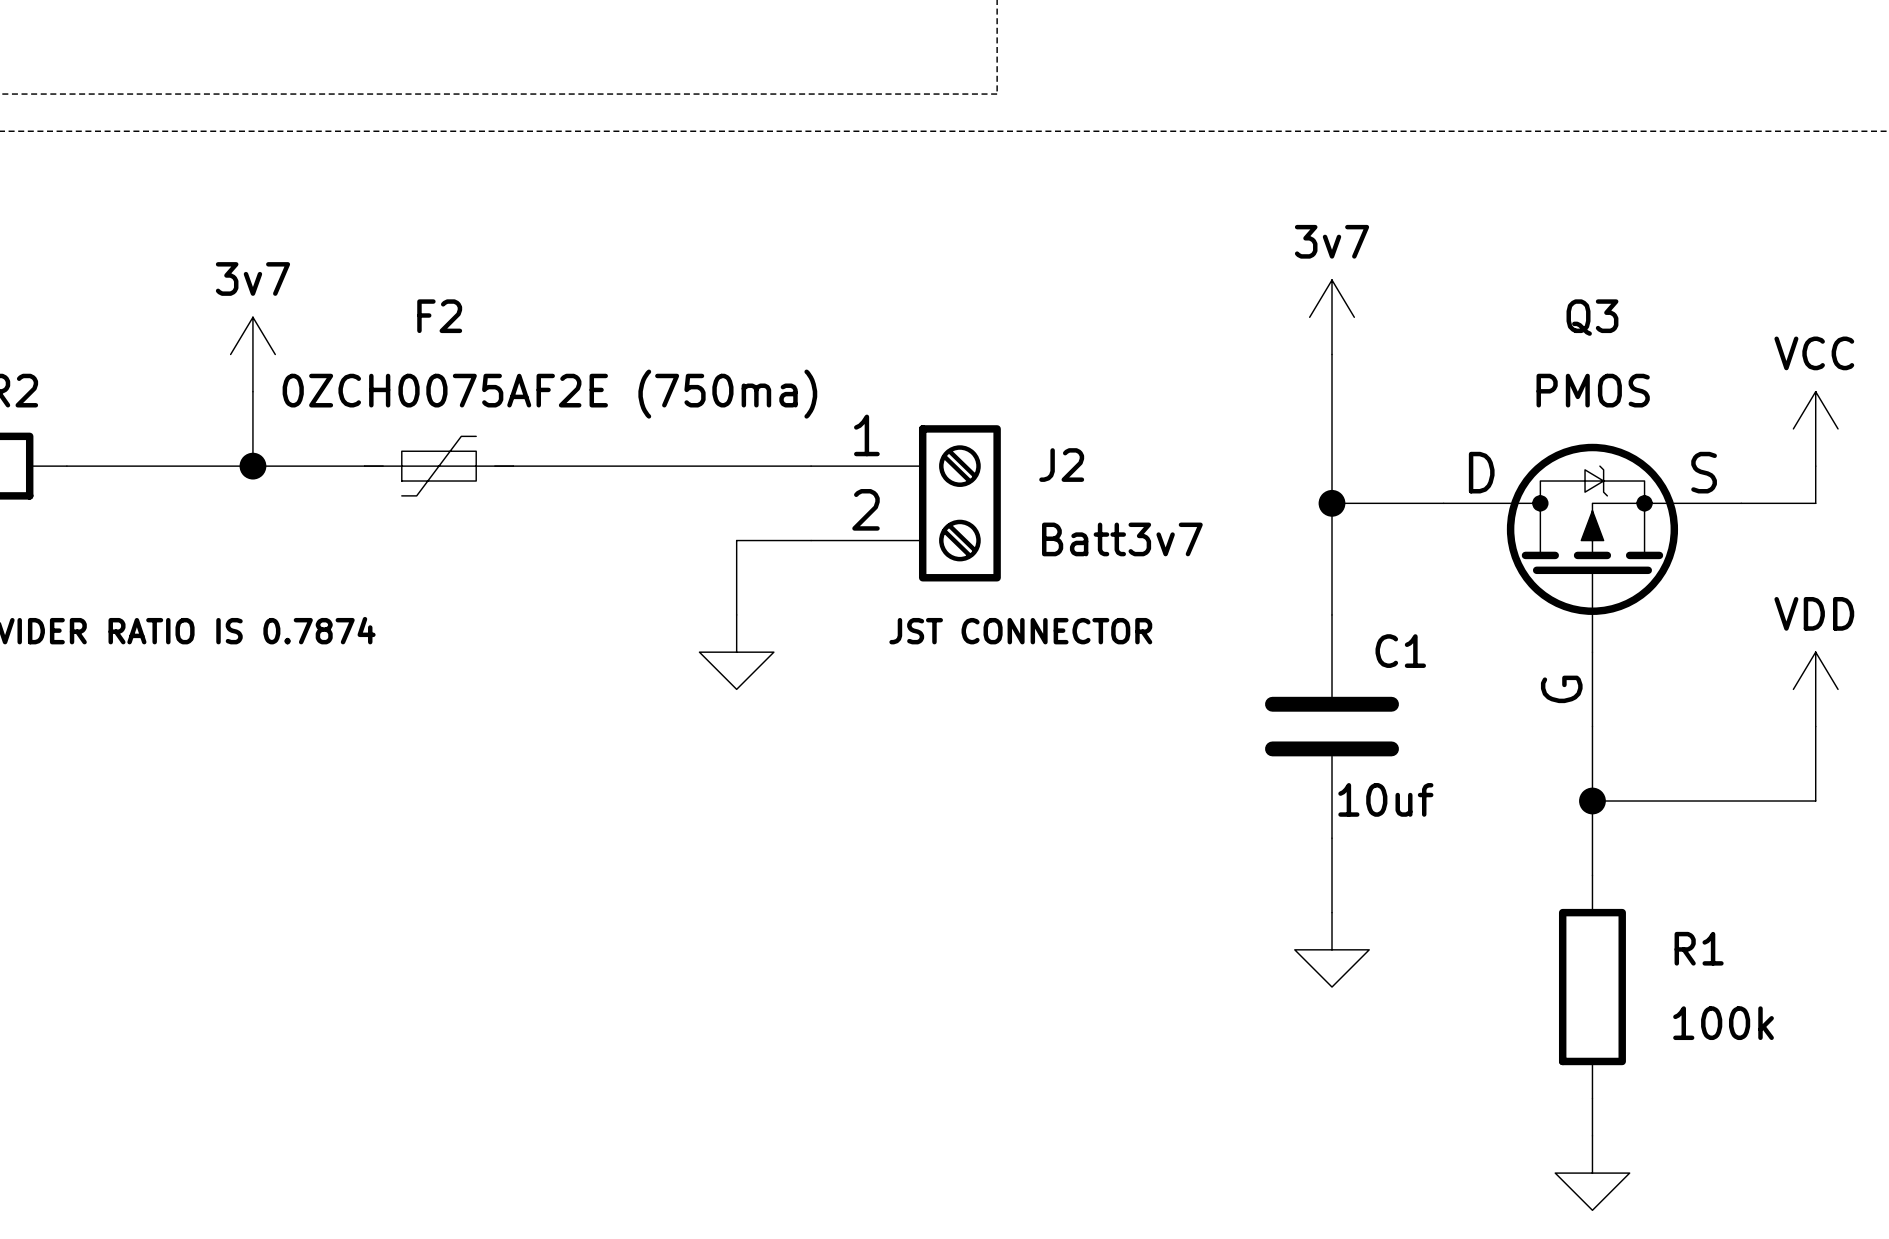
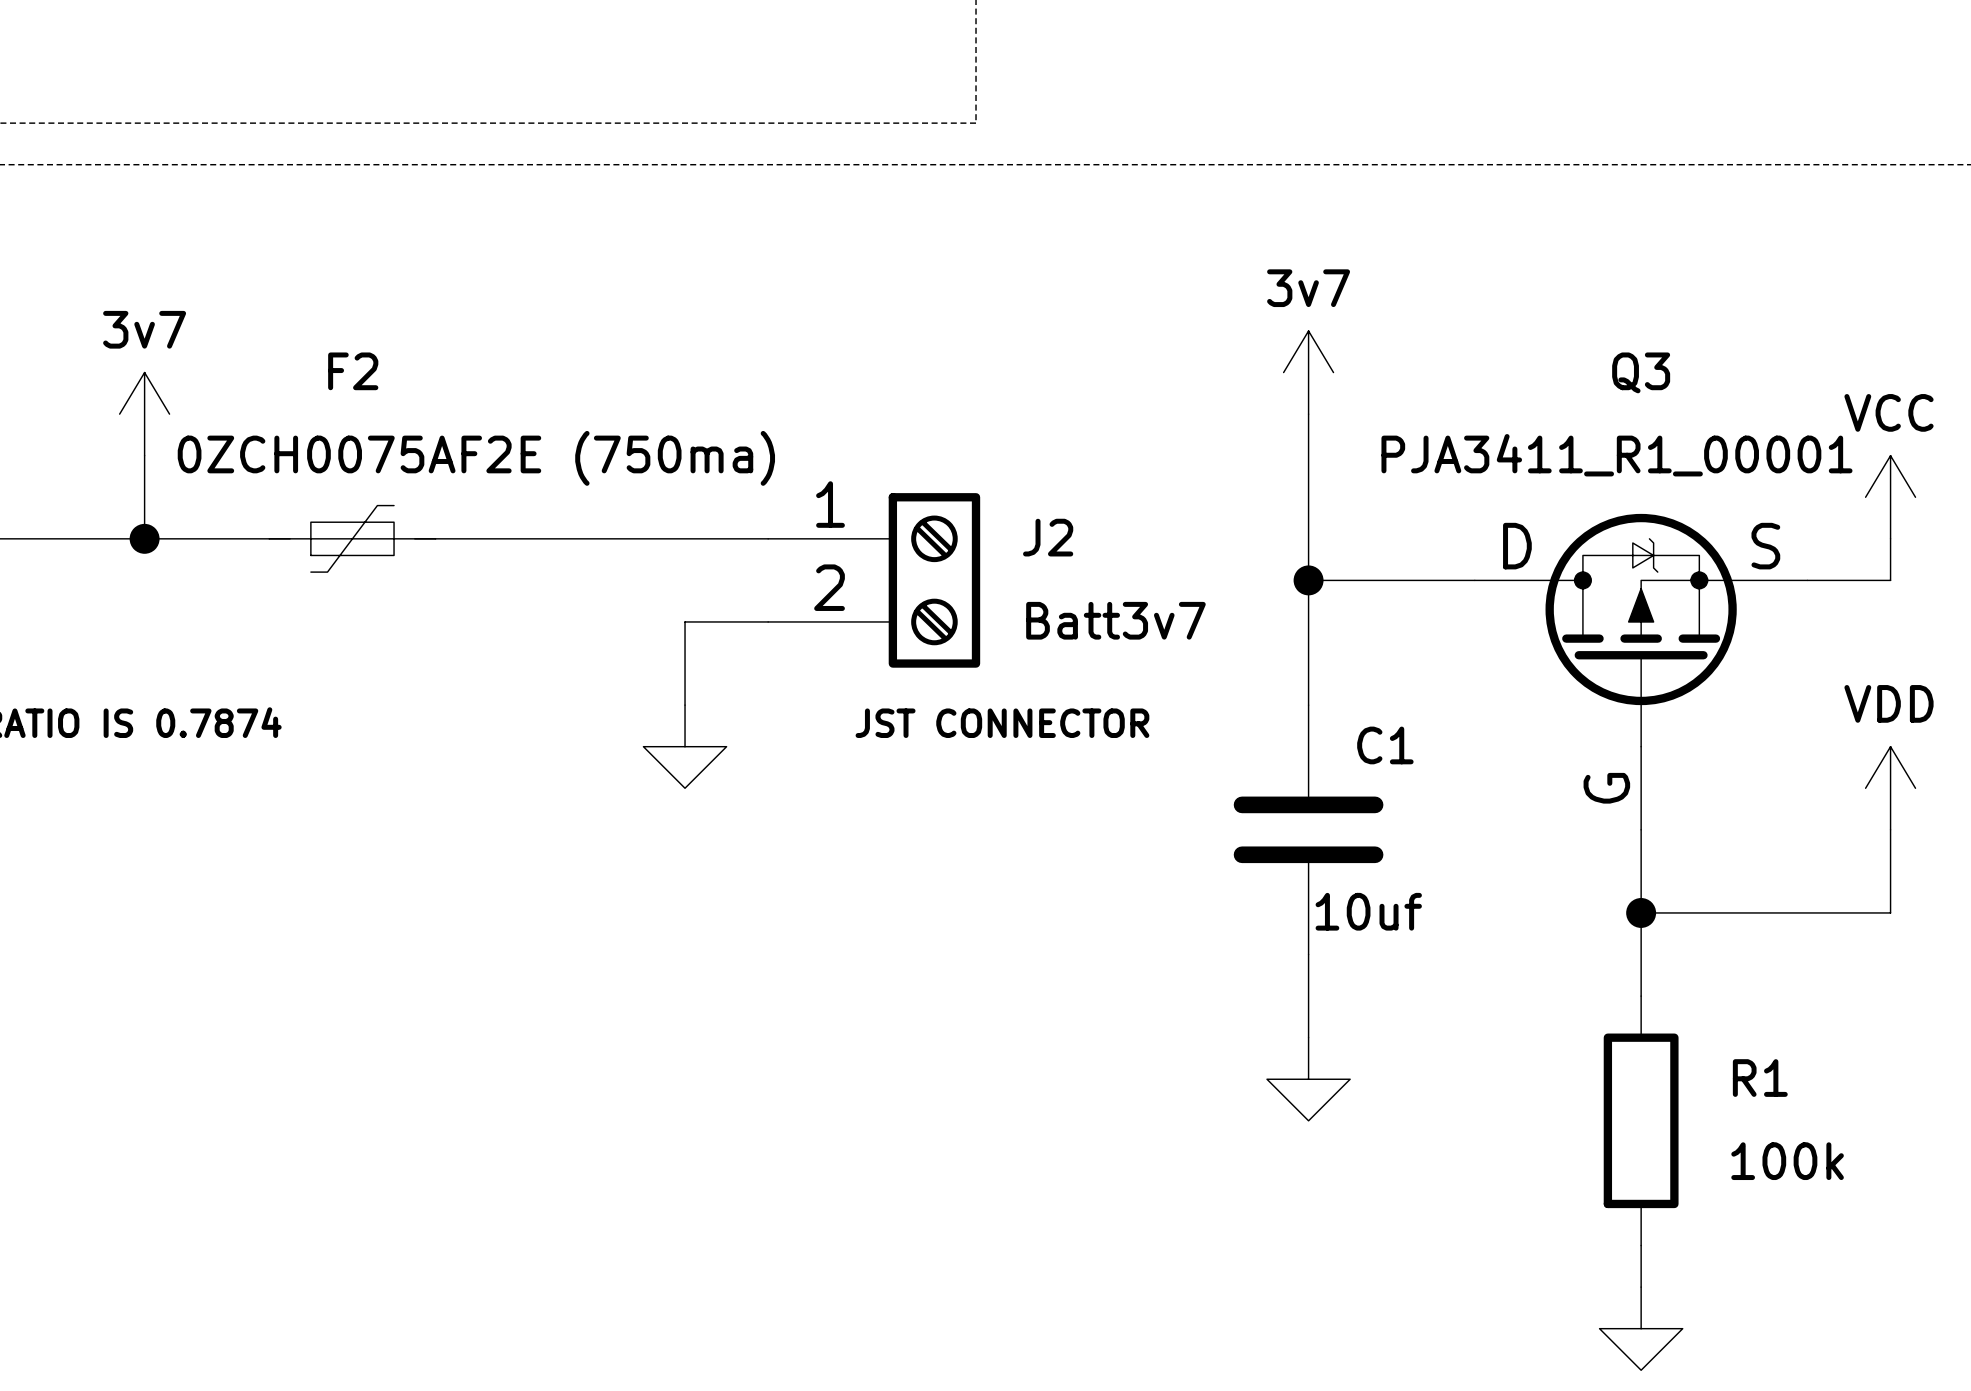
power symbol position: 3v7 (1332, 317) -> 3v7 (1308, 372)
wire: (1332, 354) (1332, 614) -> (1308, 414) (1308, 705)
Q3 value: PMOS (1593, 390) -> PJA3411_R1_00001 (1616, 455)
wire: none -> (1308, 580) (1350, 580)
junction position: (1332, 503) -> (1308, 580)
C1 position: (1332, 726) -> (1308, 829)
wire: (1332, 838) (1332, 912) -> (1308, 954) (1308, 1037)
power symbol position: (1332, 949) -> (1308, 1079)

